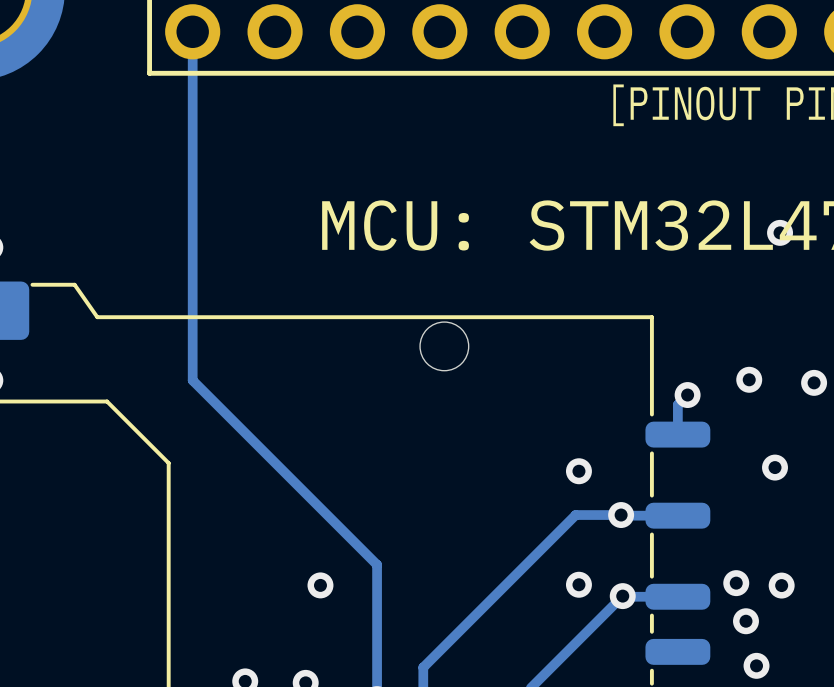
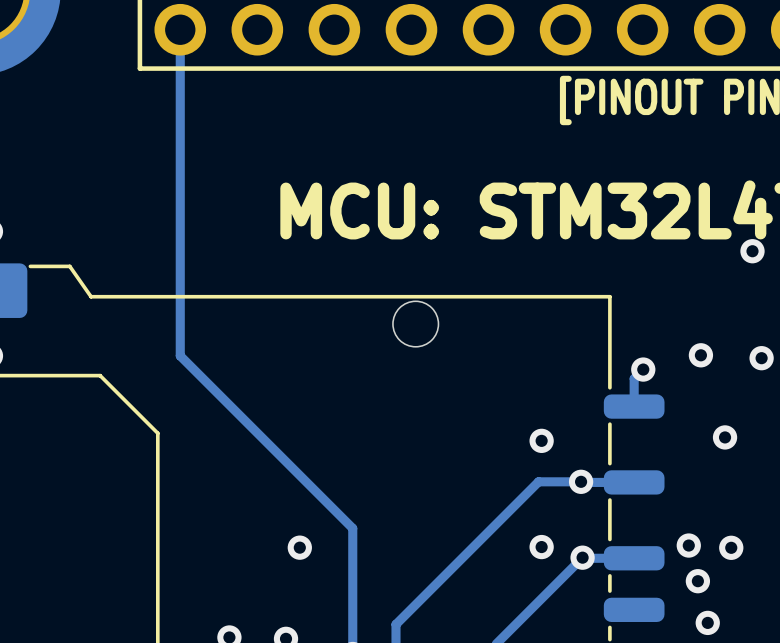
via position: (780, 232) -> (752, 251)

